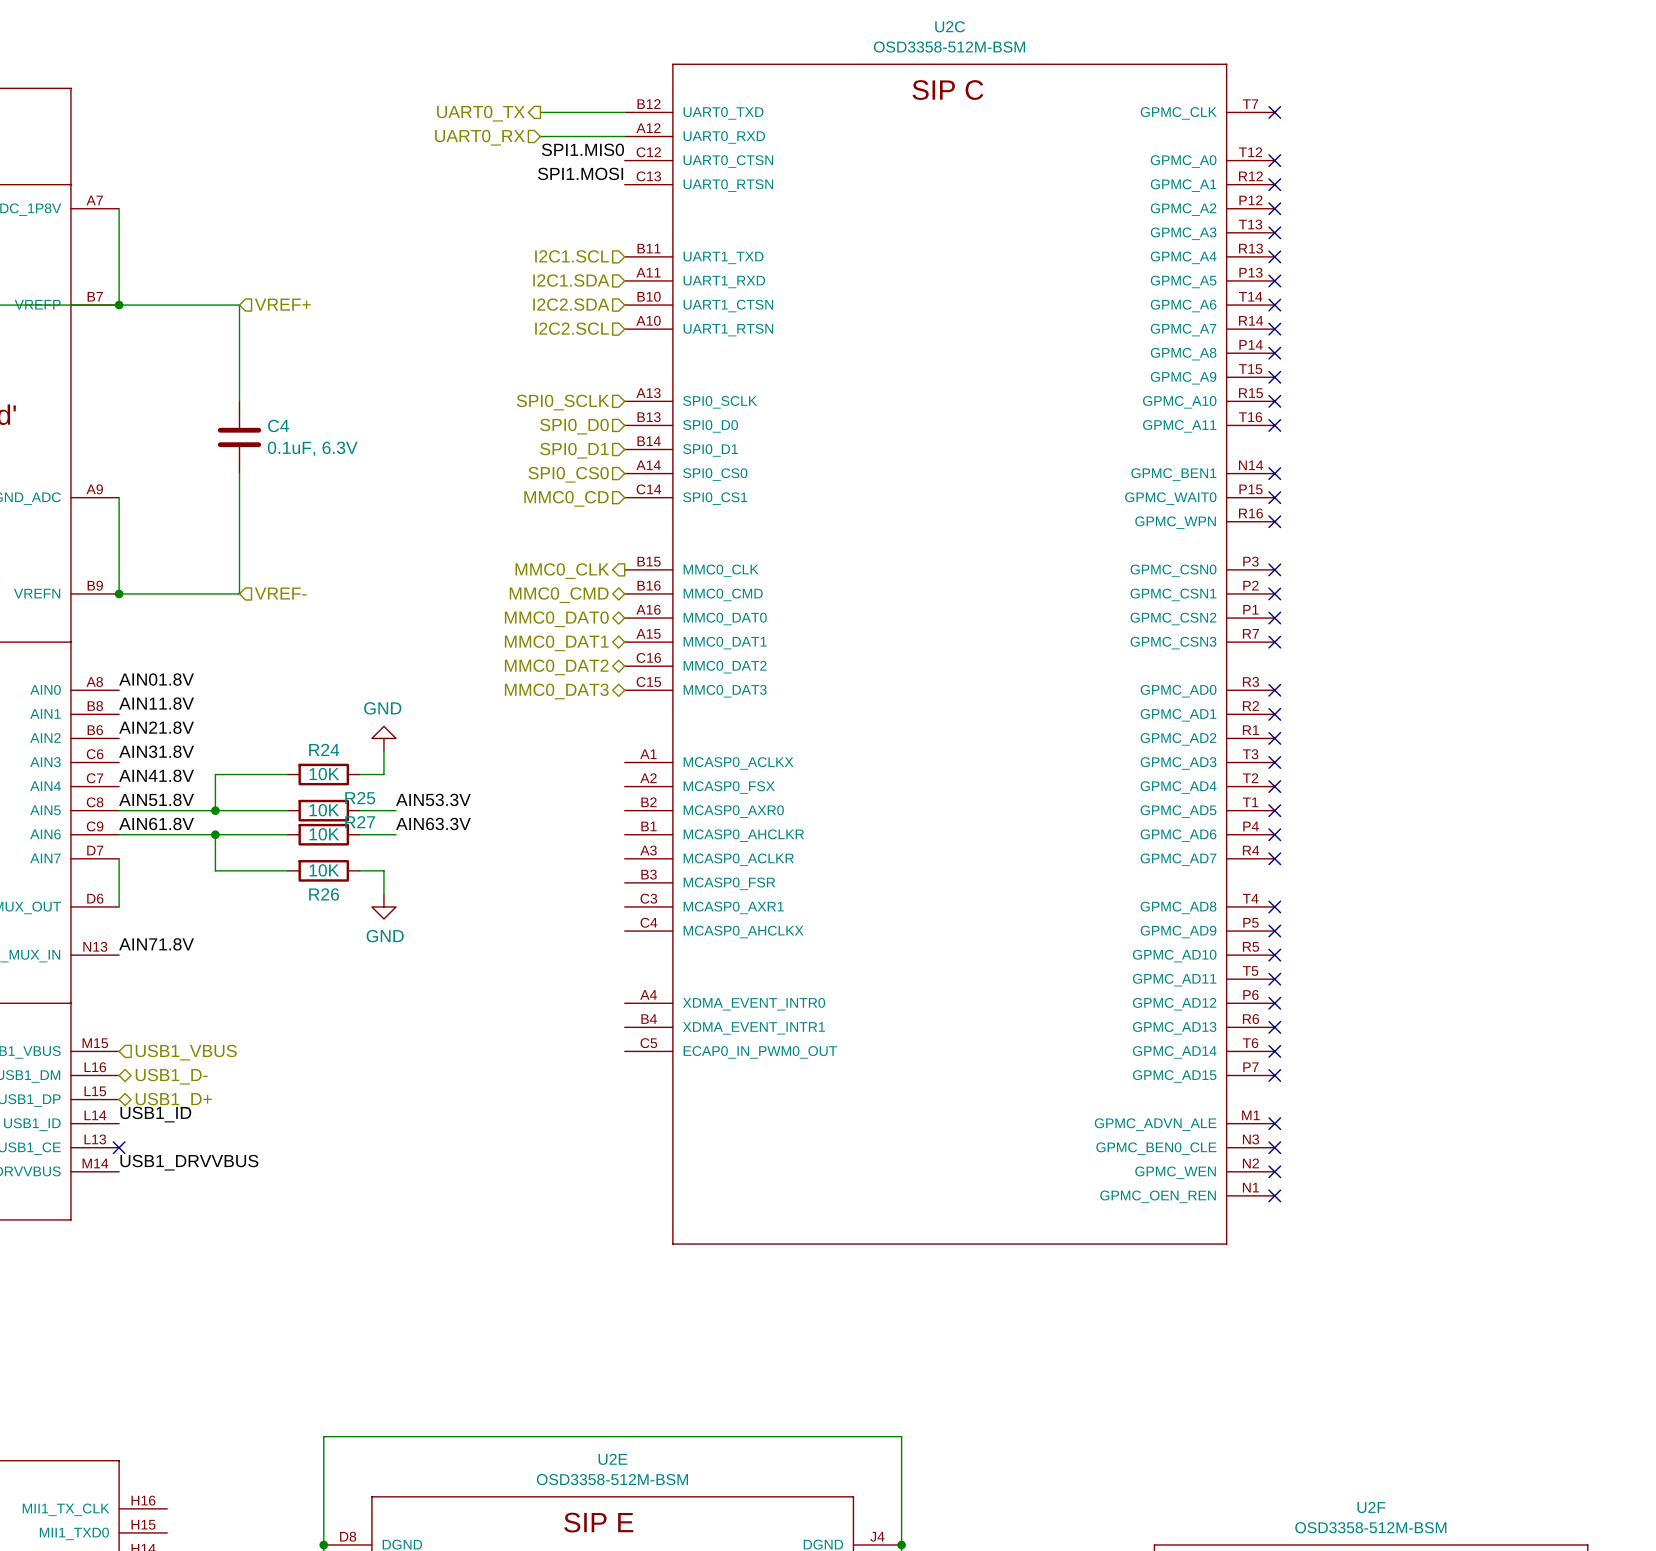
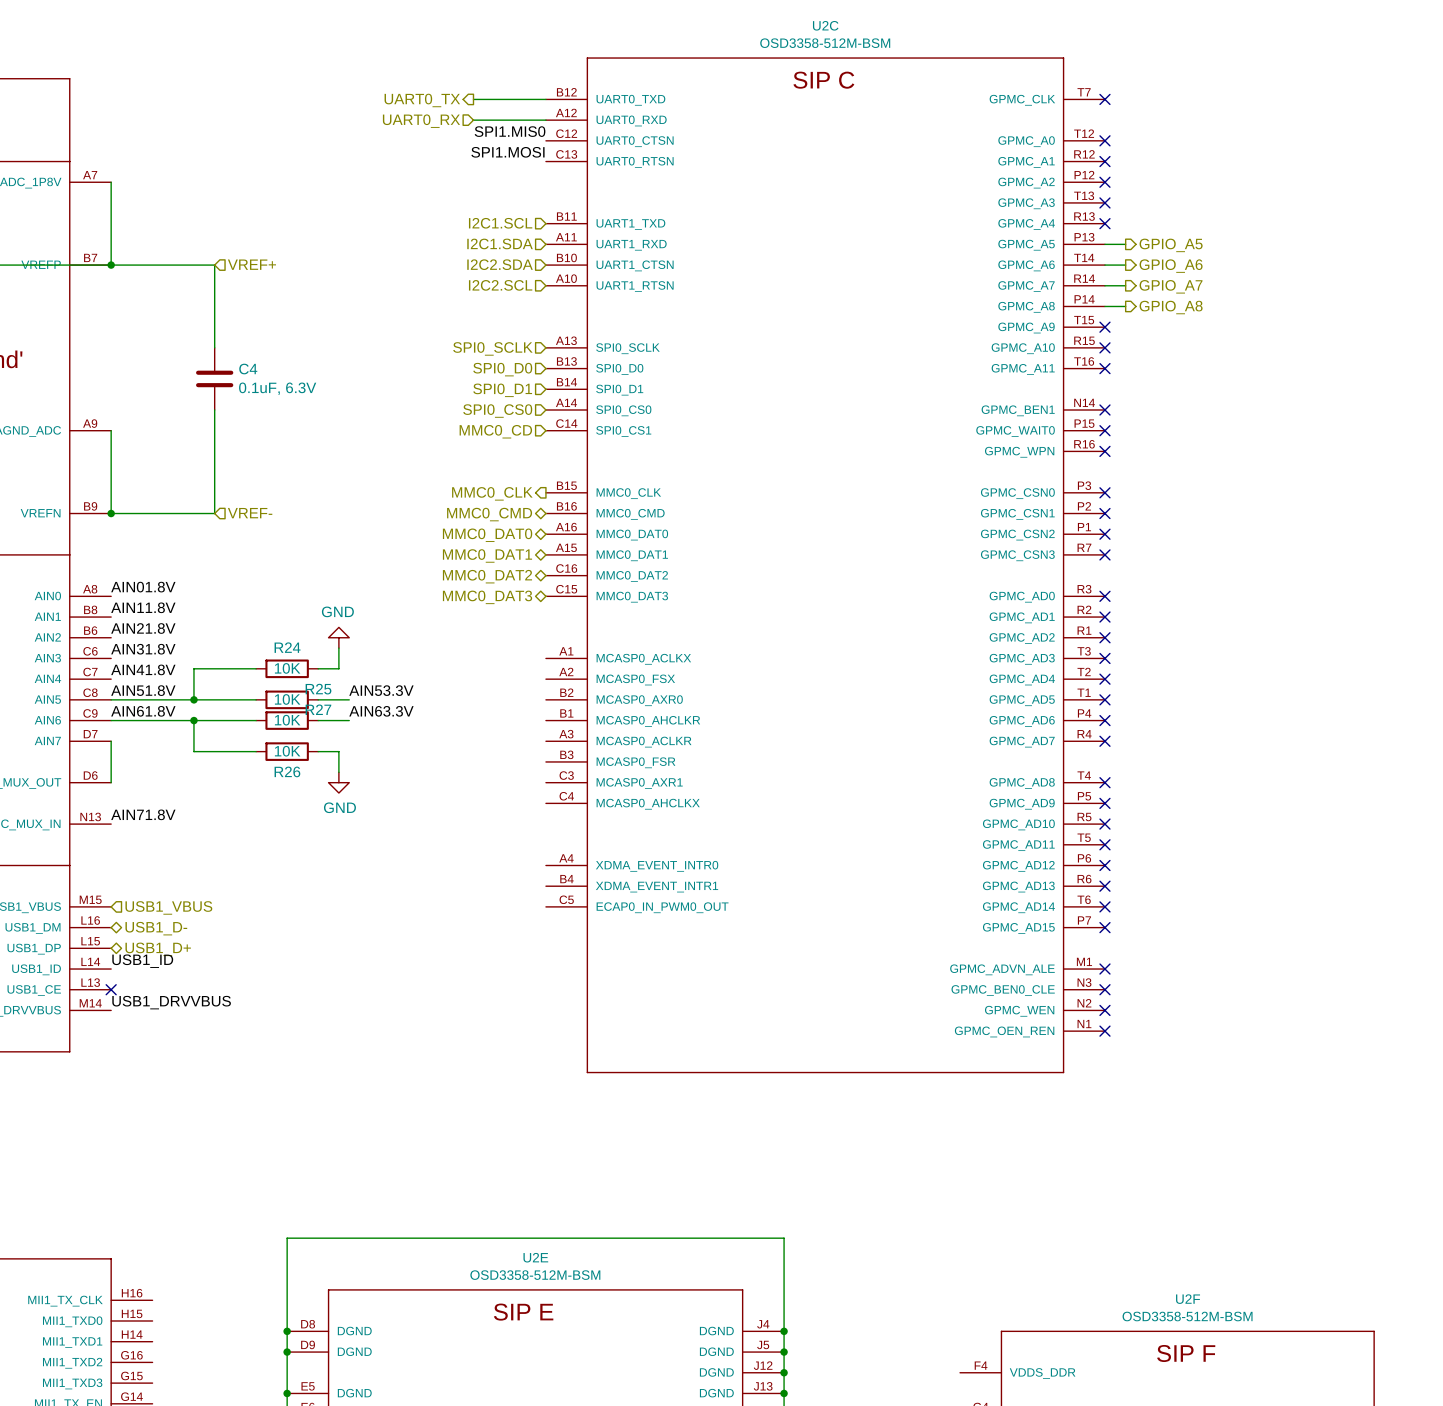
wire: none -> (1104, 244) (1125, 244)
no-connect mark: (1274, 280) -> none
hierarchical label: none -> GPIO_A5 (1171, 245)
wire: none -> (1104, 265) (1125, 265)
no-connect mark: (1274, 305) -> none
hierarchical label: none -> GPIO_A6 (1171, 266)
wire: none -> (1104, 285) (1125, 285)
no-connect mark: (1274, 329) -> none
hierarchical label: none -> GPIO_A7 (1171, 286)
wire: none -> (1104, 306) (1125, 306)
no-connect mark: (1274, 353) -> none
hierarchical label: none -> GPIO_A8 (1171, 307)

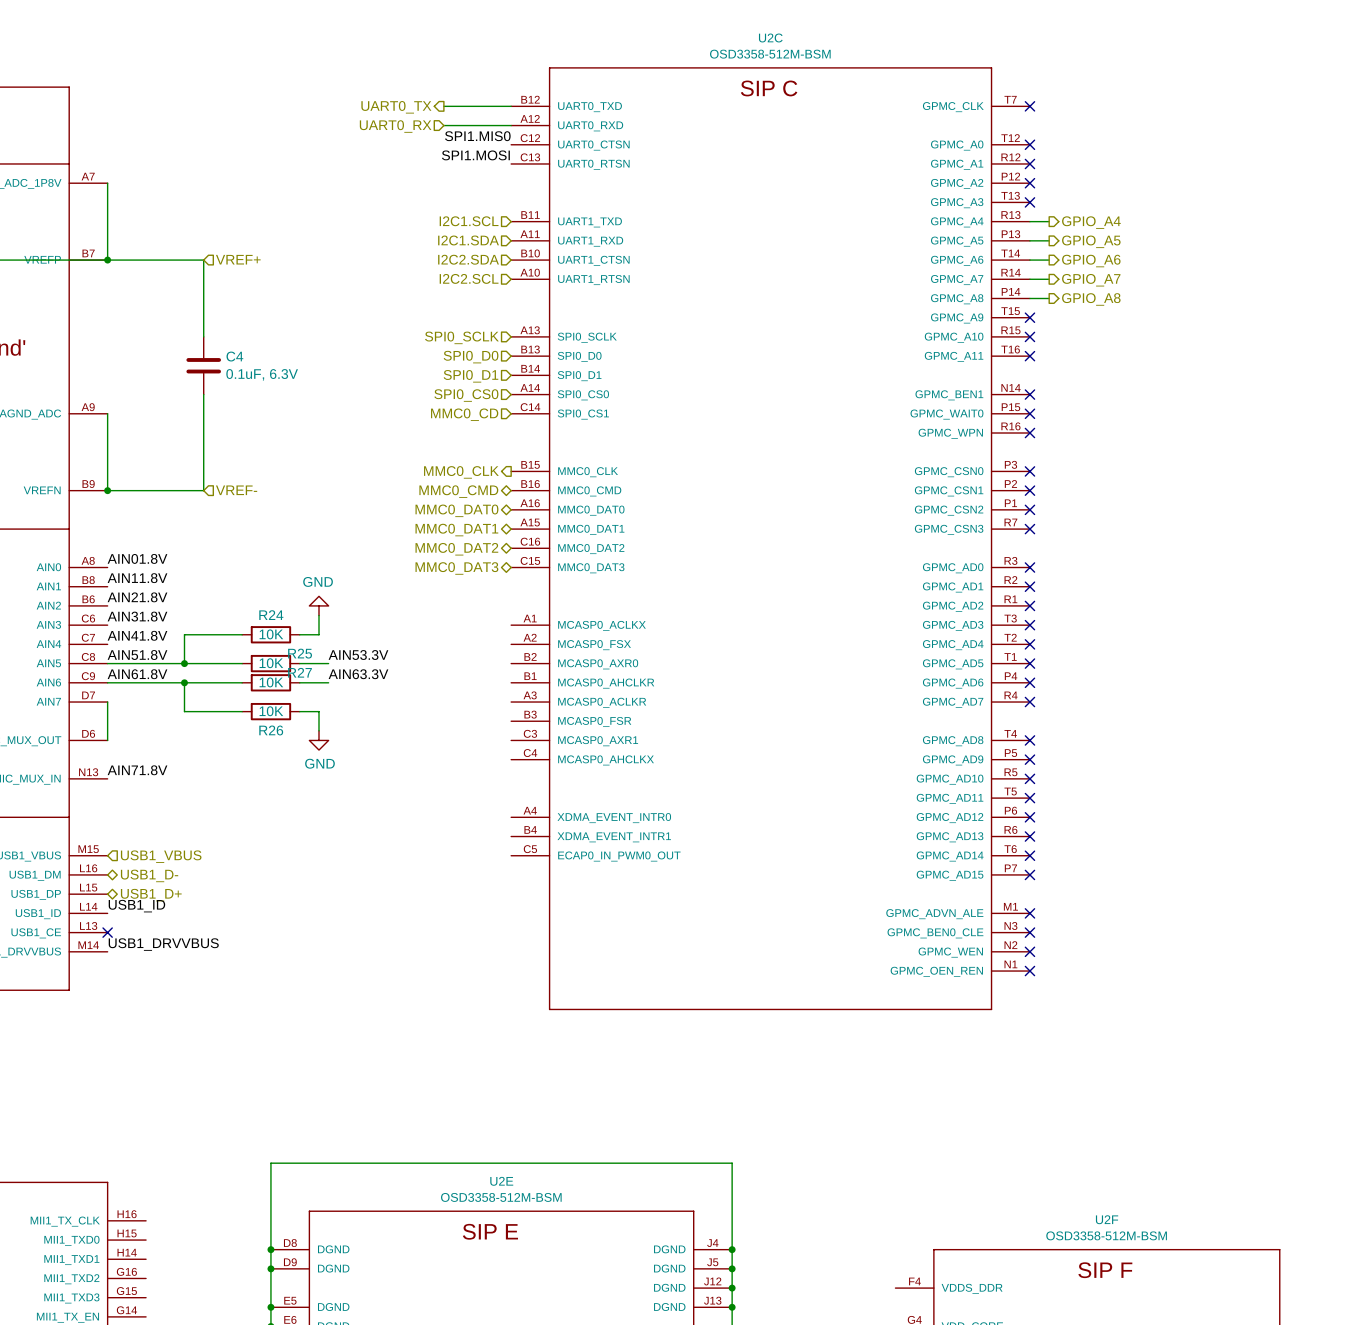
wire: none -> (1029, 221) (1049, 221)
no-connect mark: (1104, 223) -> none
hierarchical label: none -> GPIO_A4 (1091, 222)

